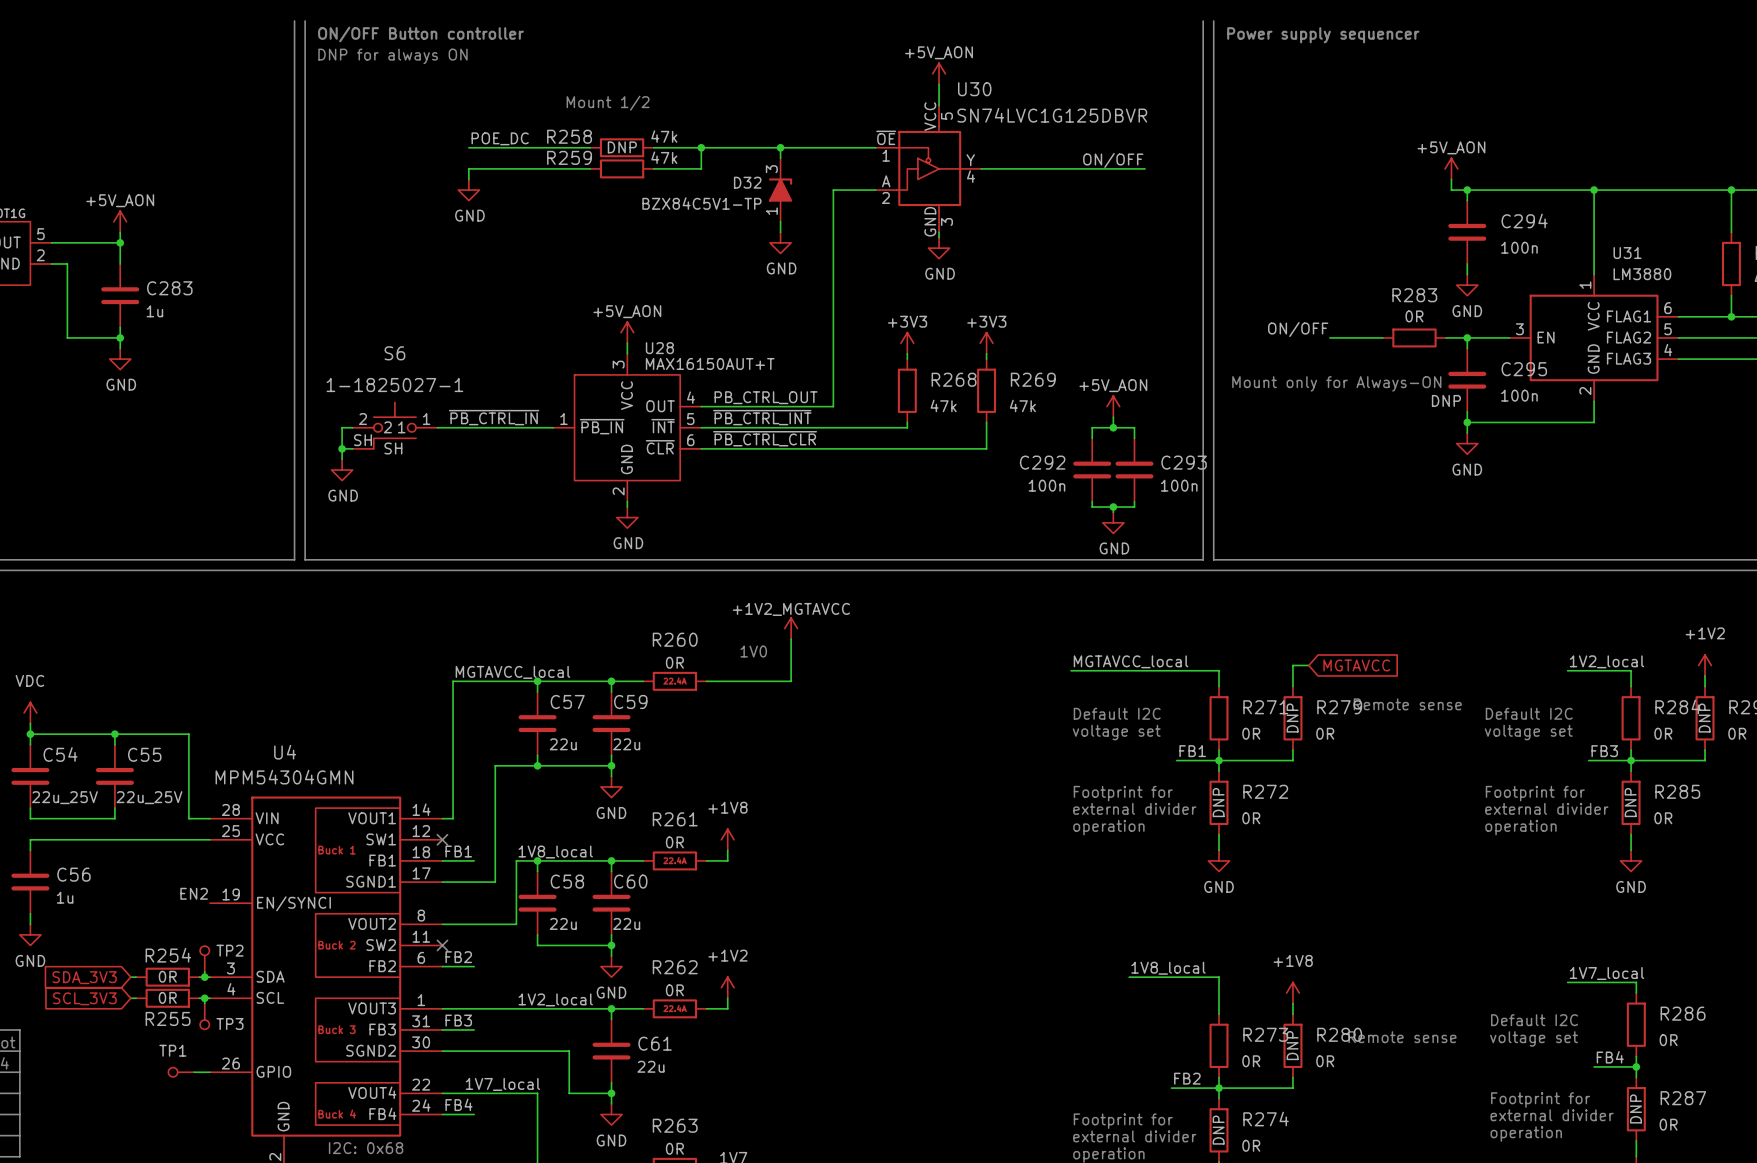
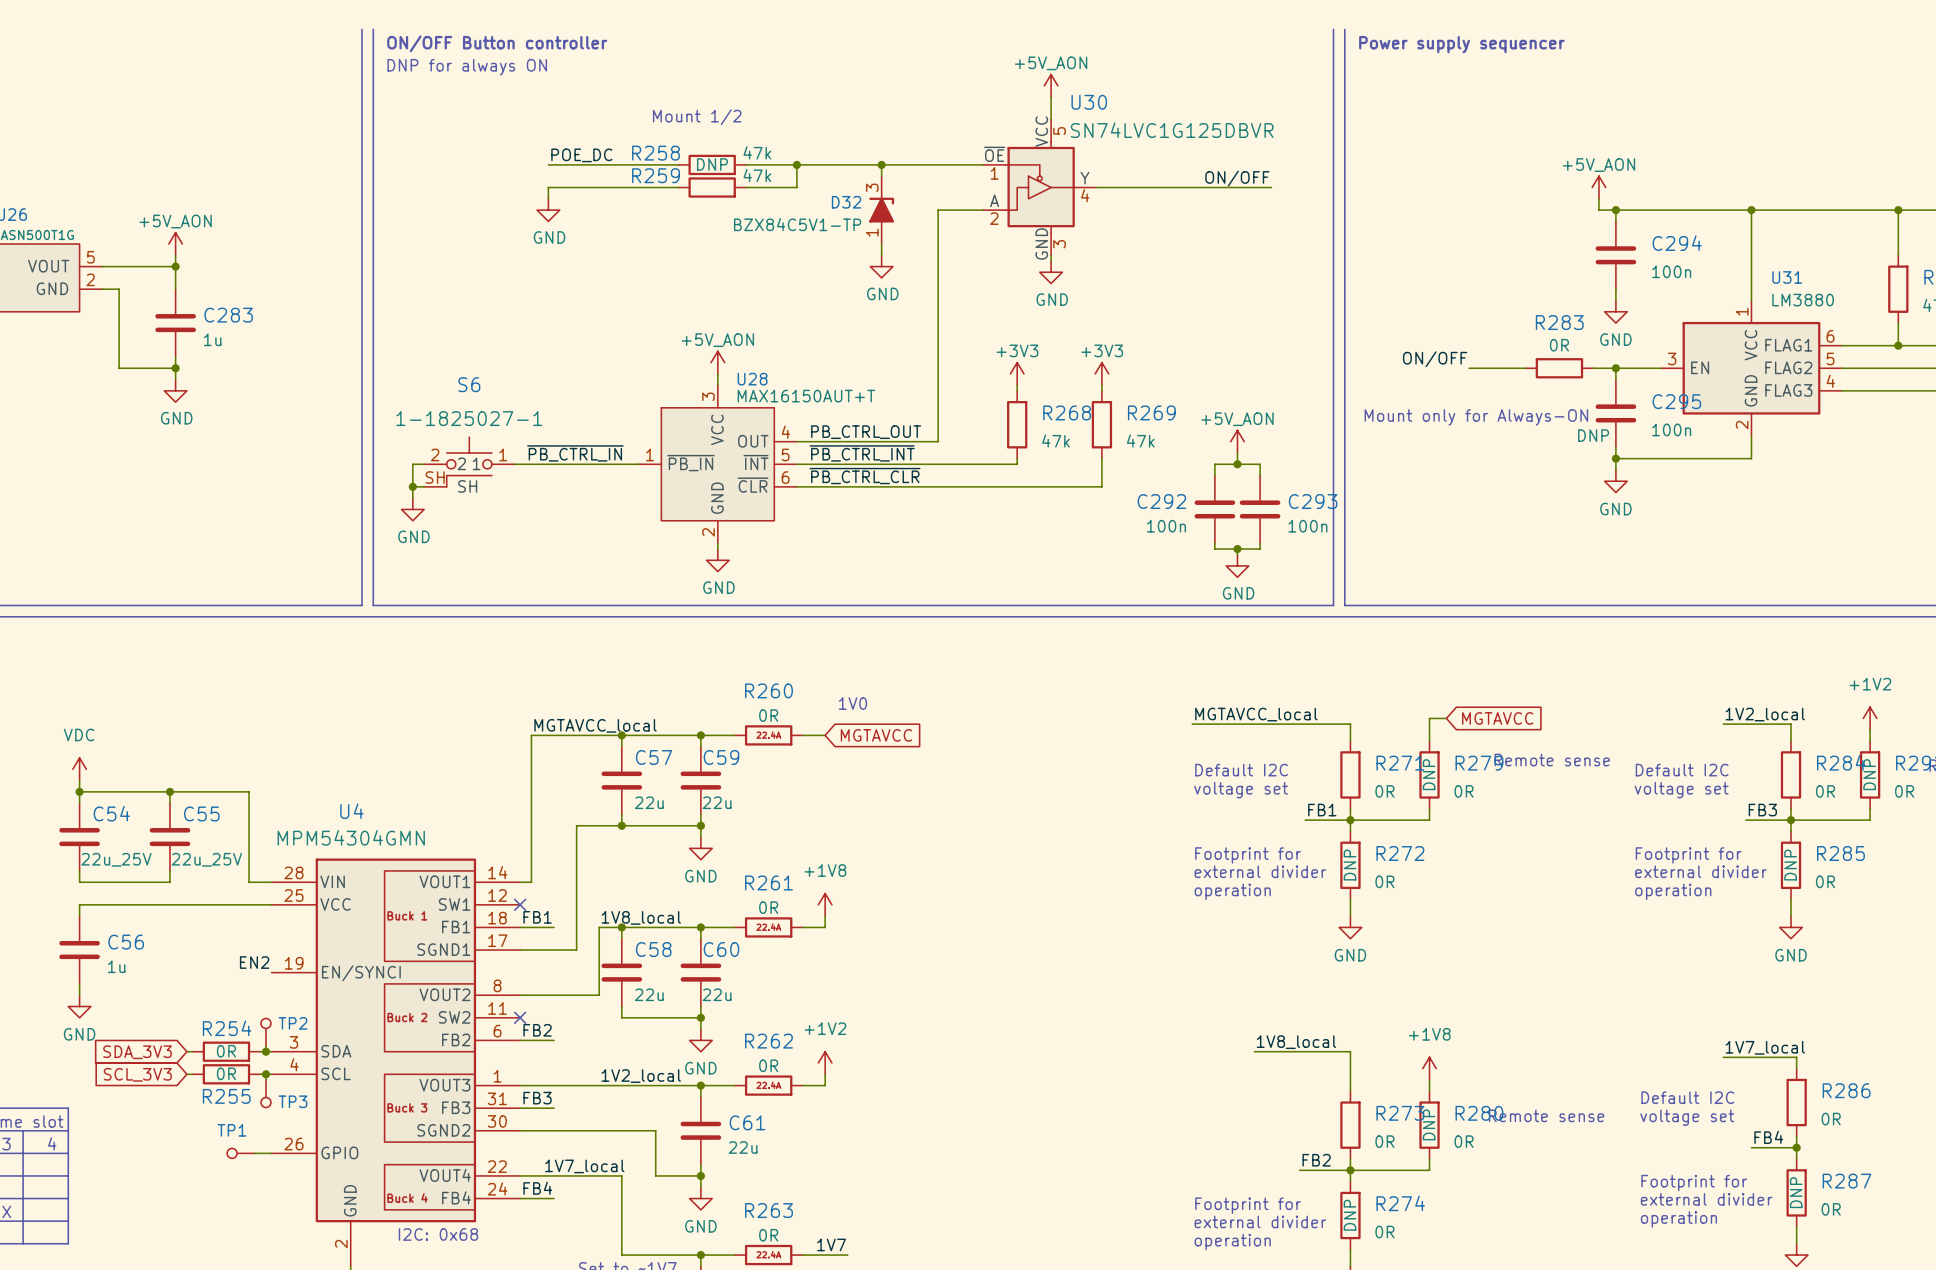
power symbol: +1V2_MGTAVCC (791, 628) -> none
wire: (791, 639) (791, 681) (727, 681) -> none
global label: none -> MGTAVCC (876, 735)

